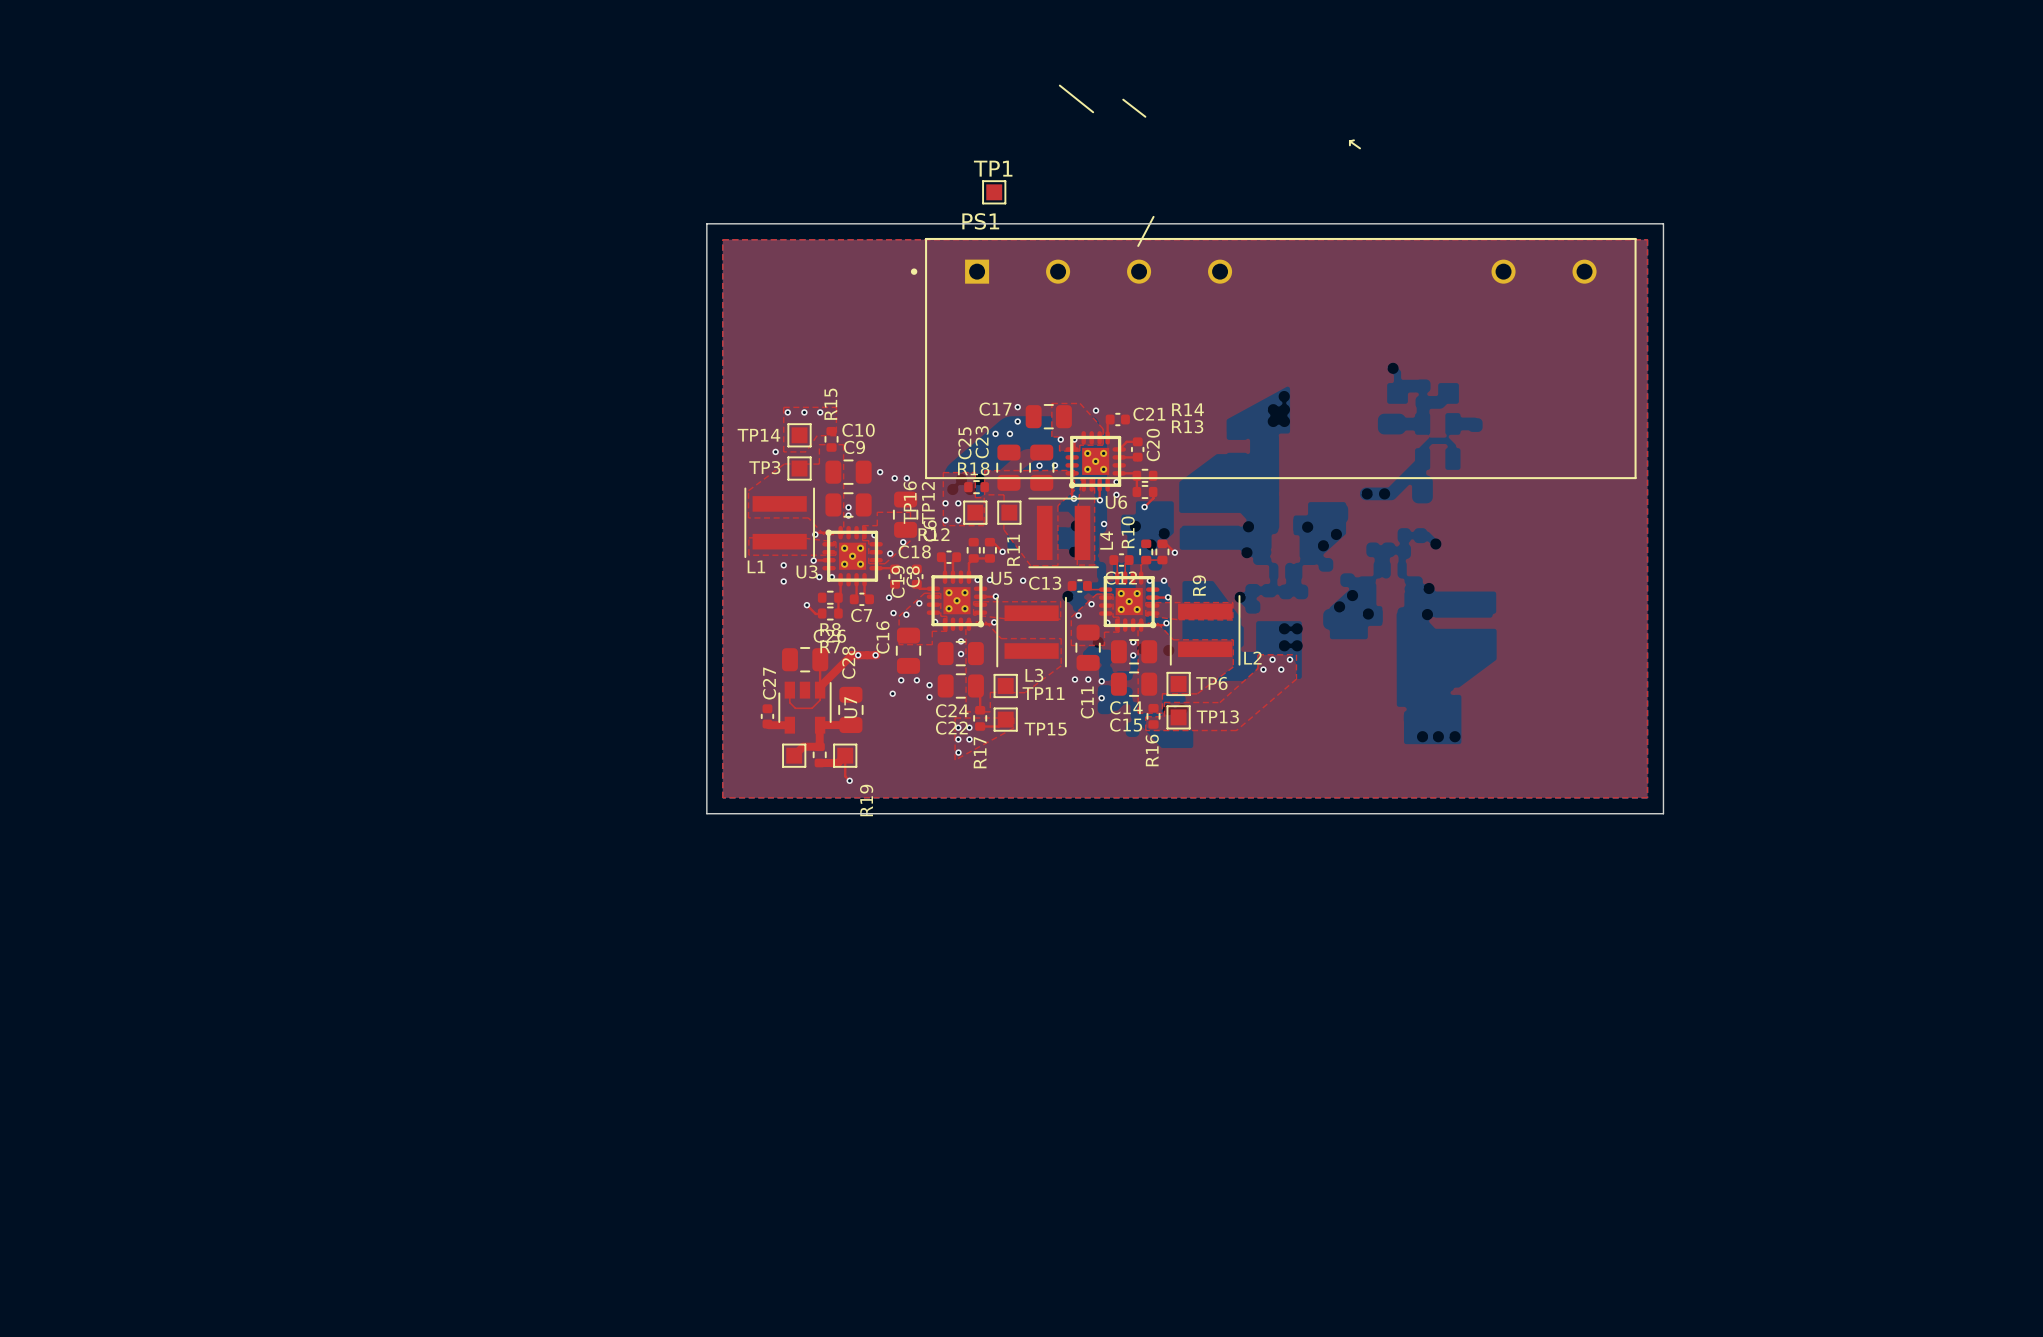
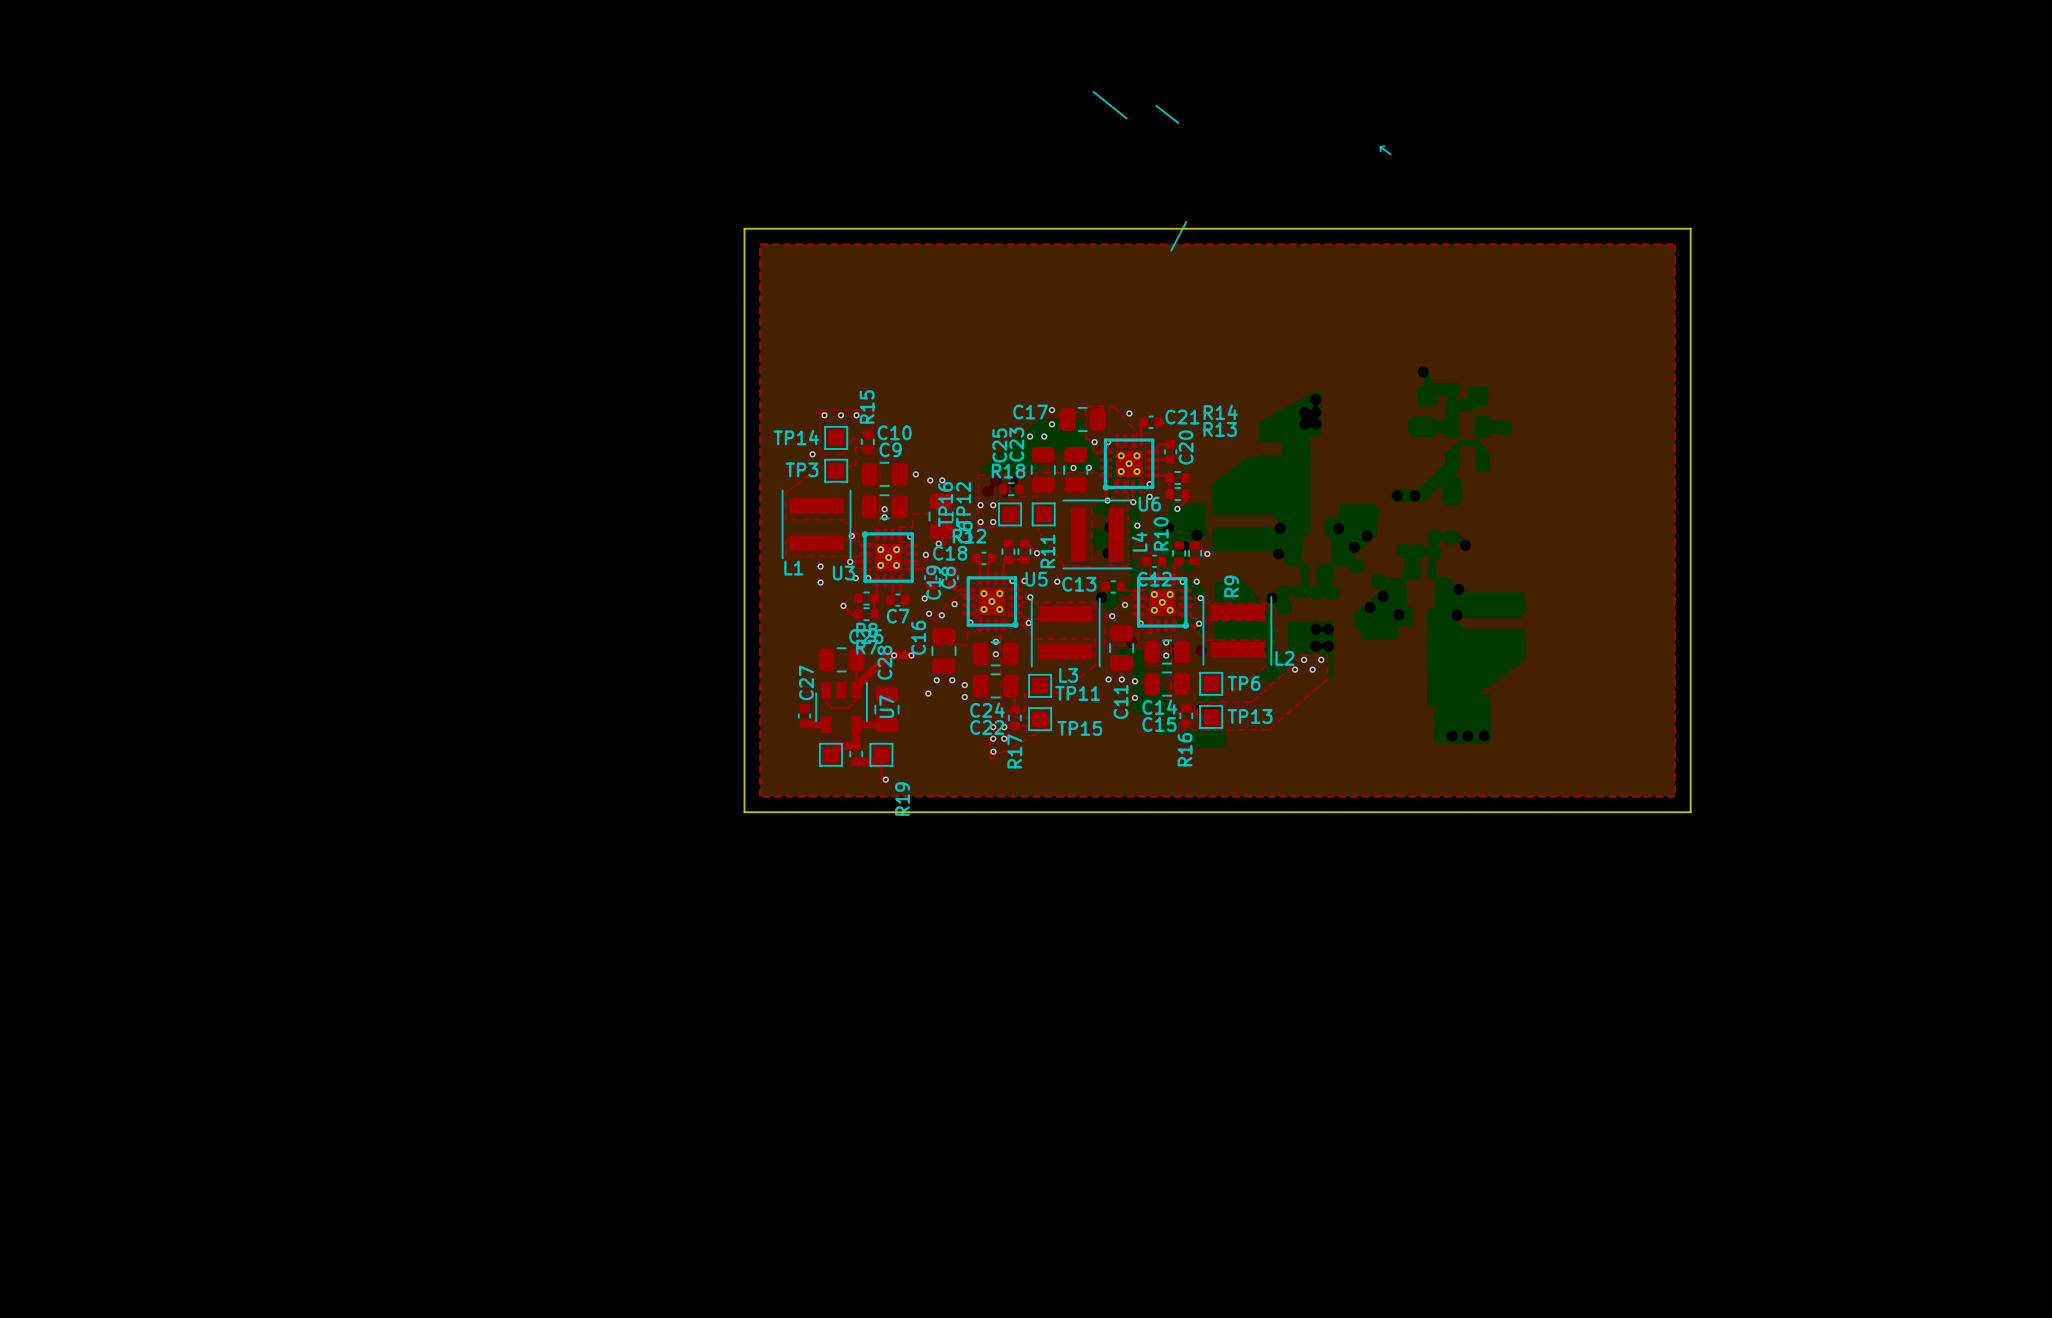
TP1: (994, 192) -> none
PS1: (1273, 358) -> none

